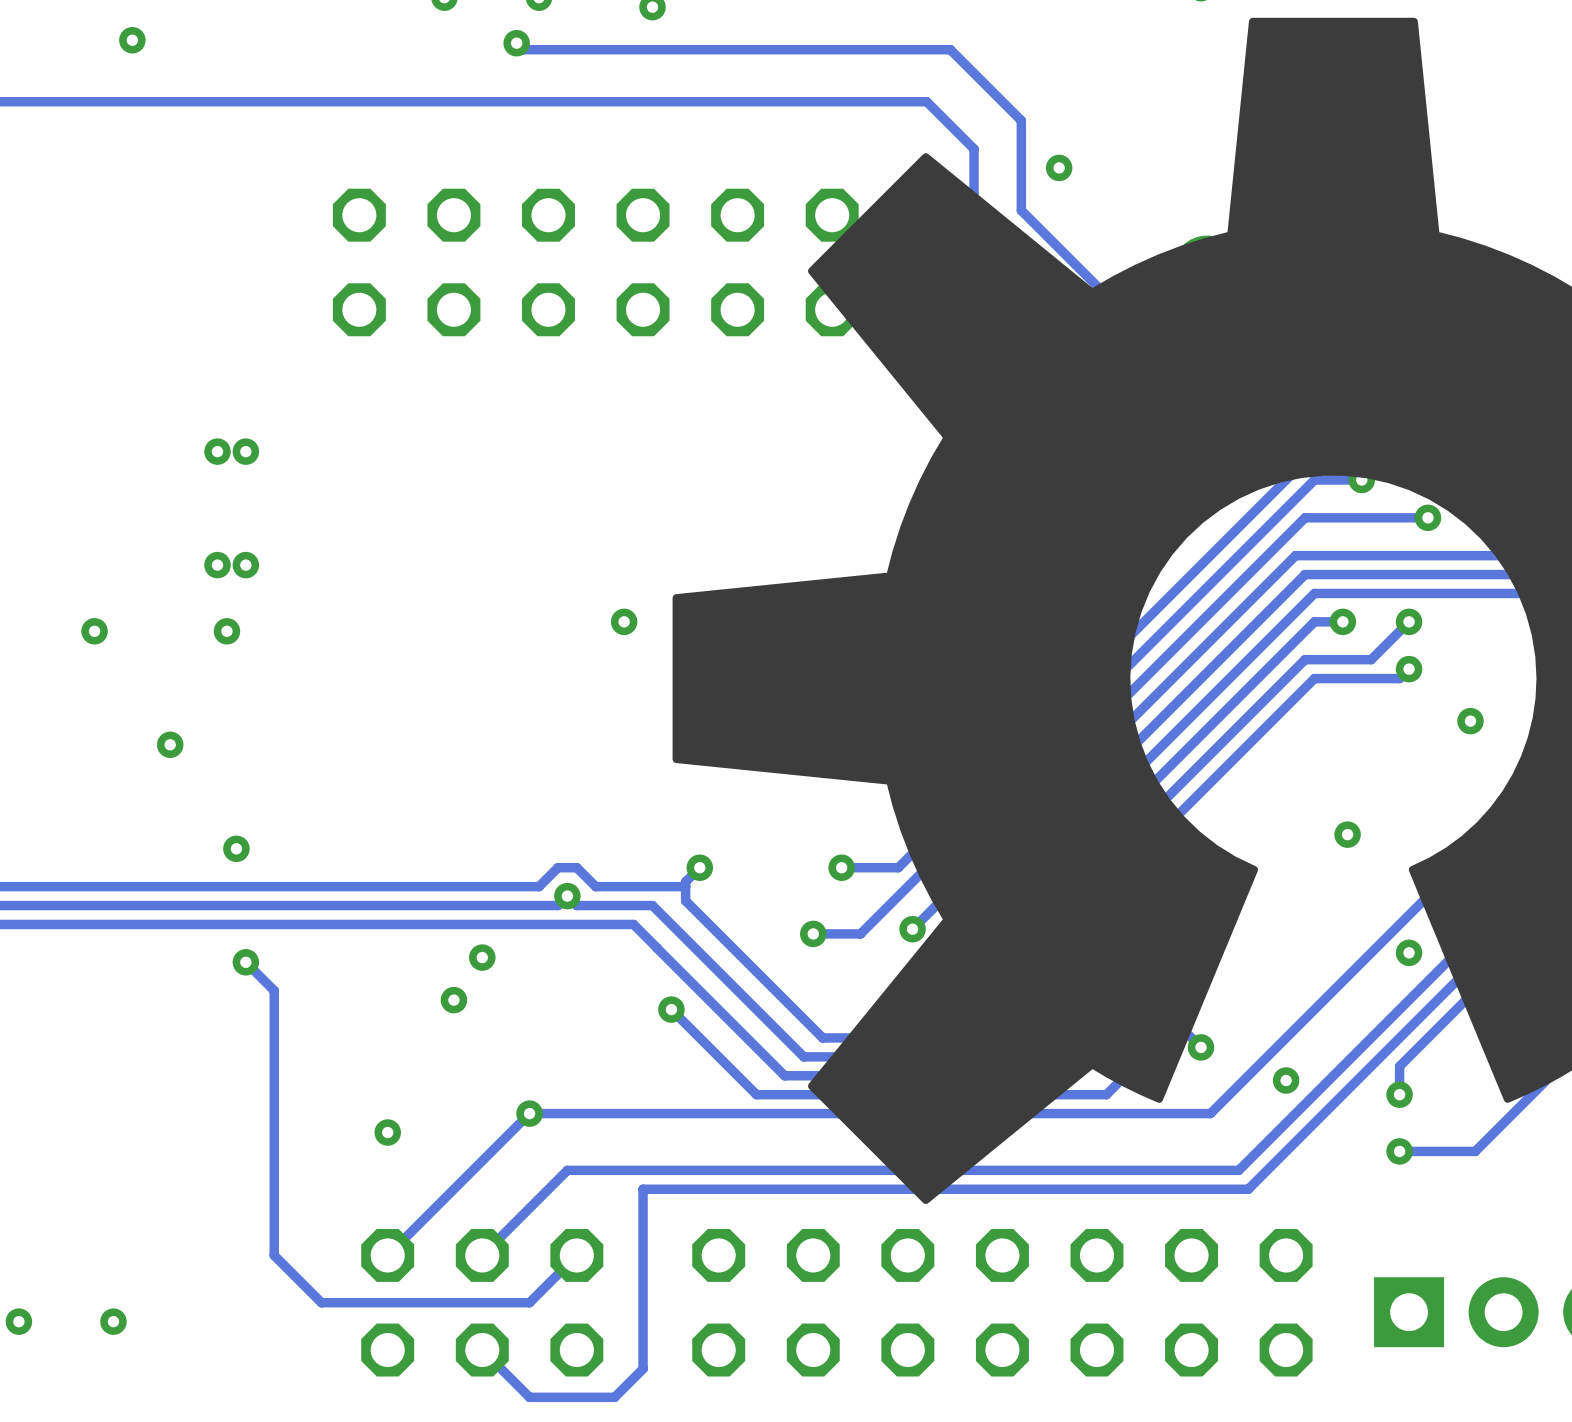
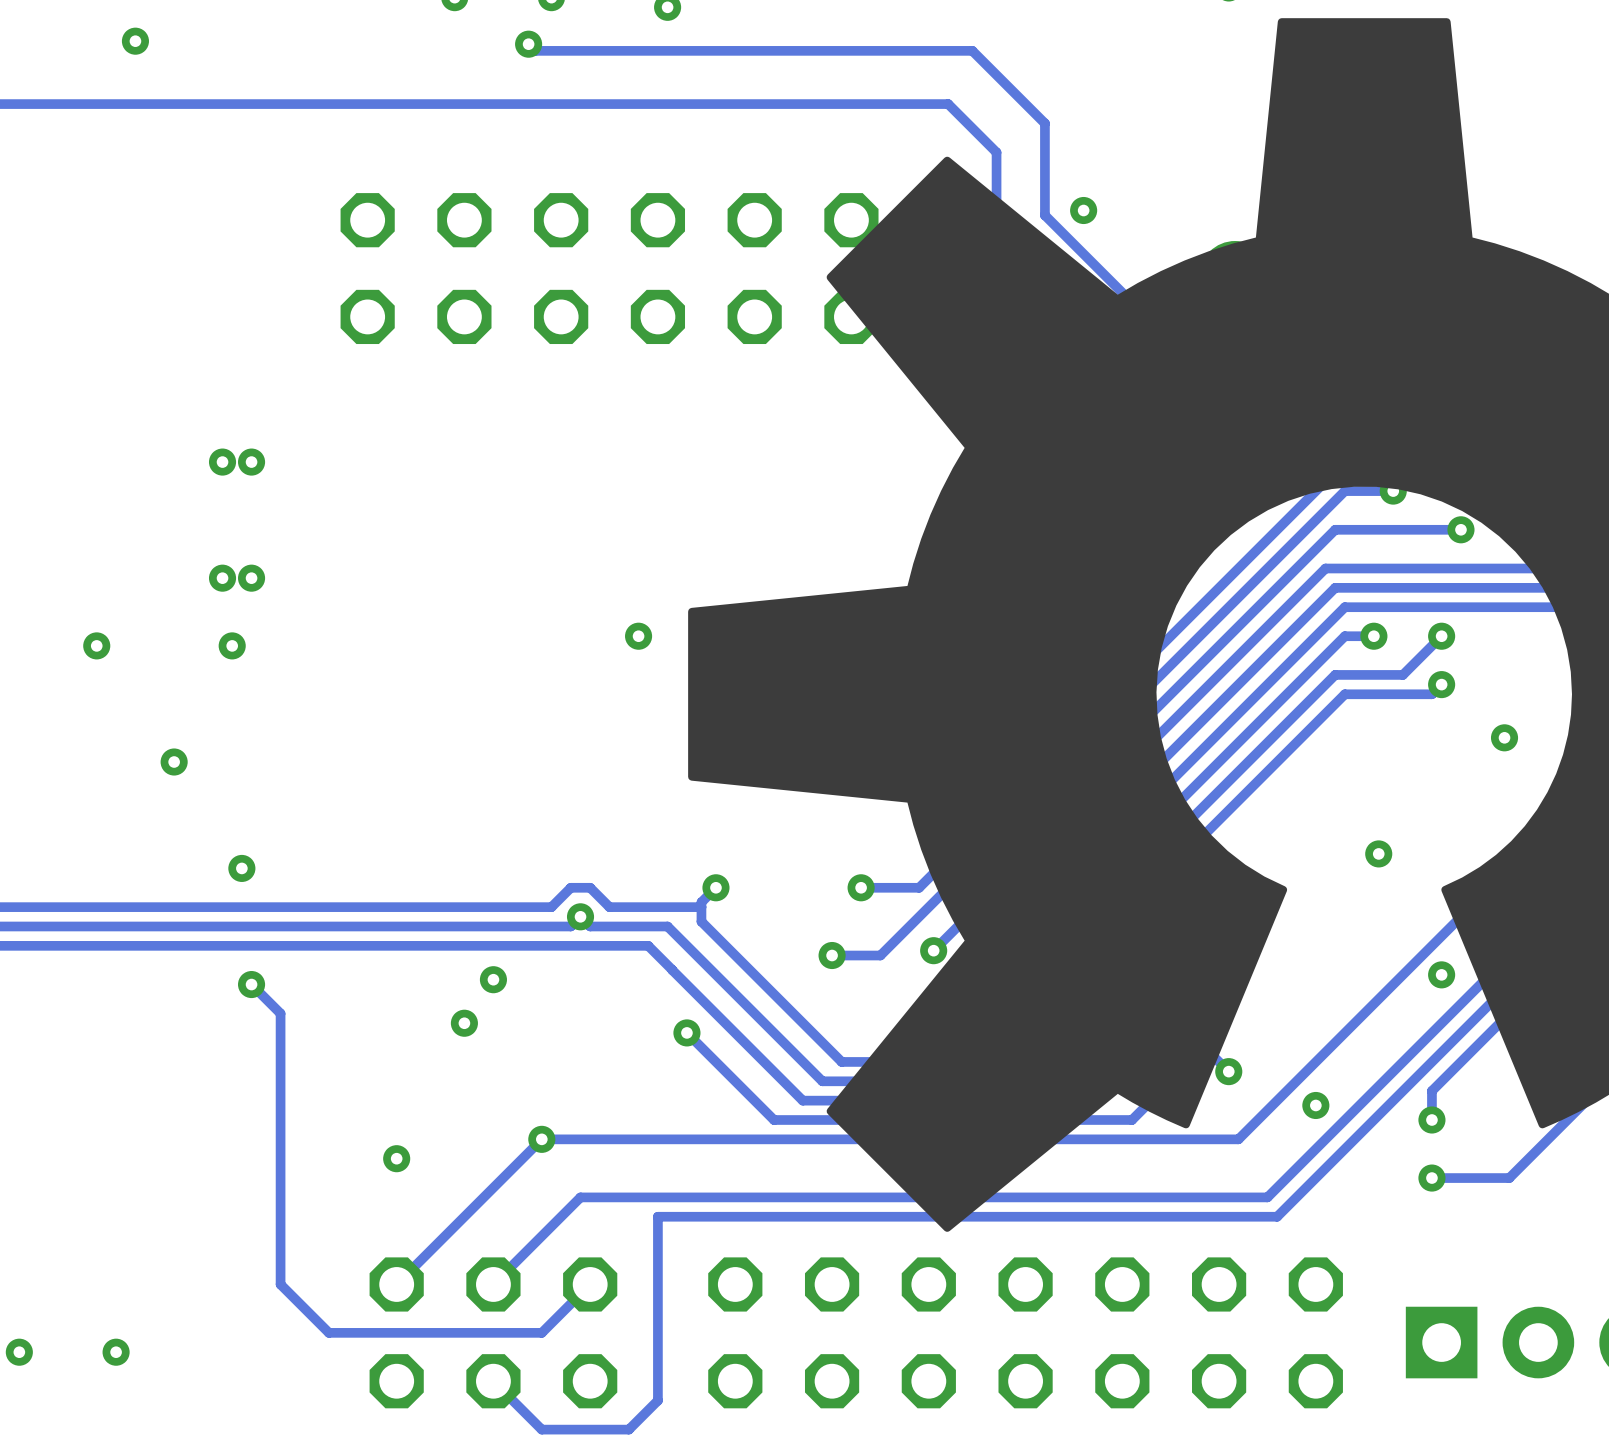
via position: (1059, 167) -> (1083, 210)

